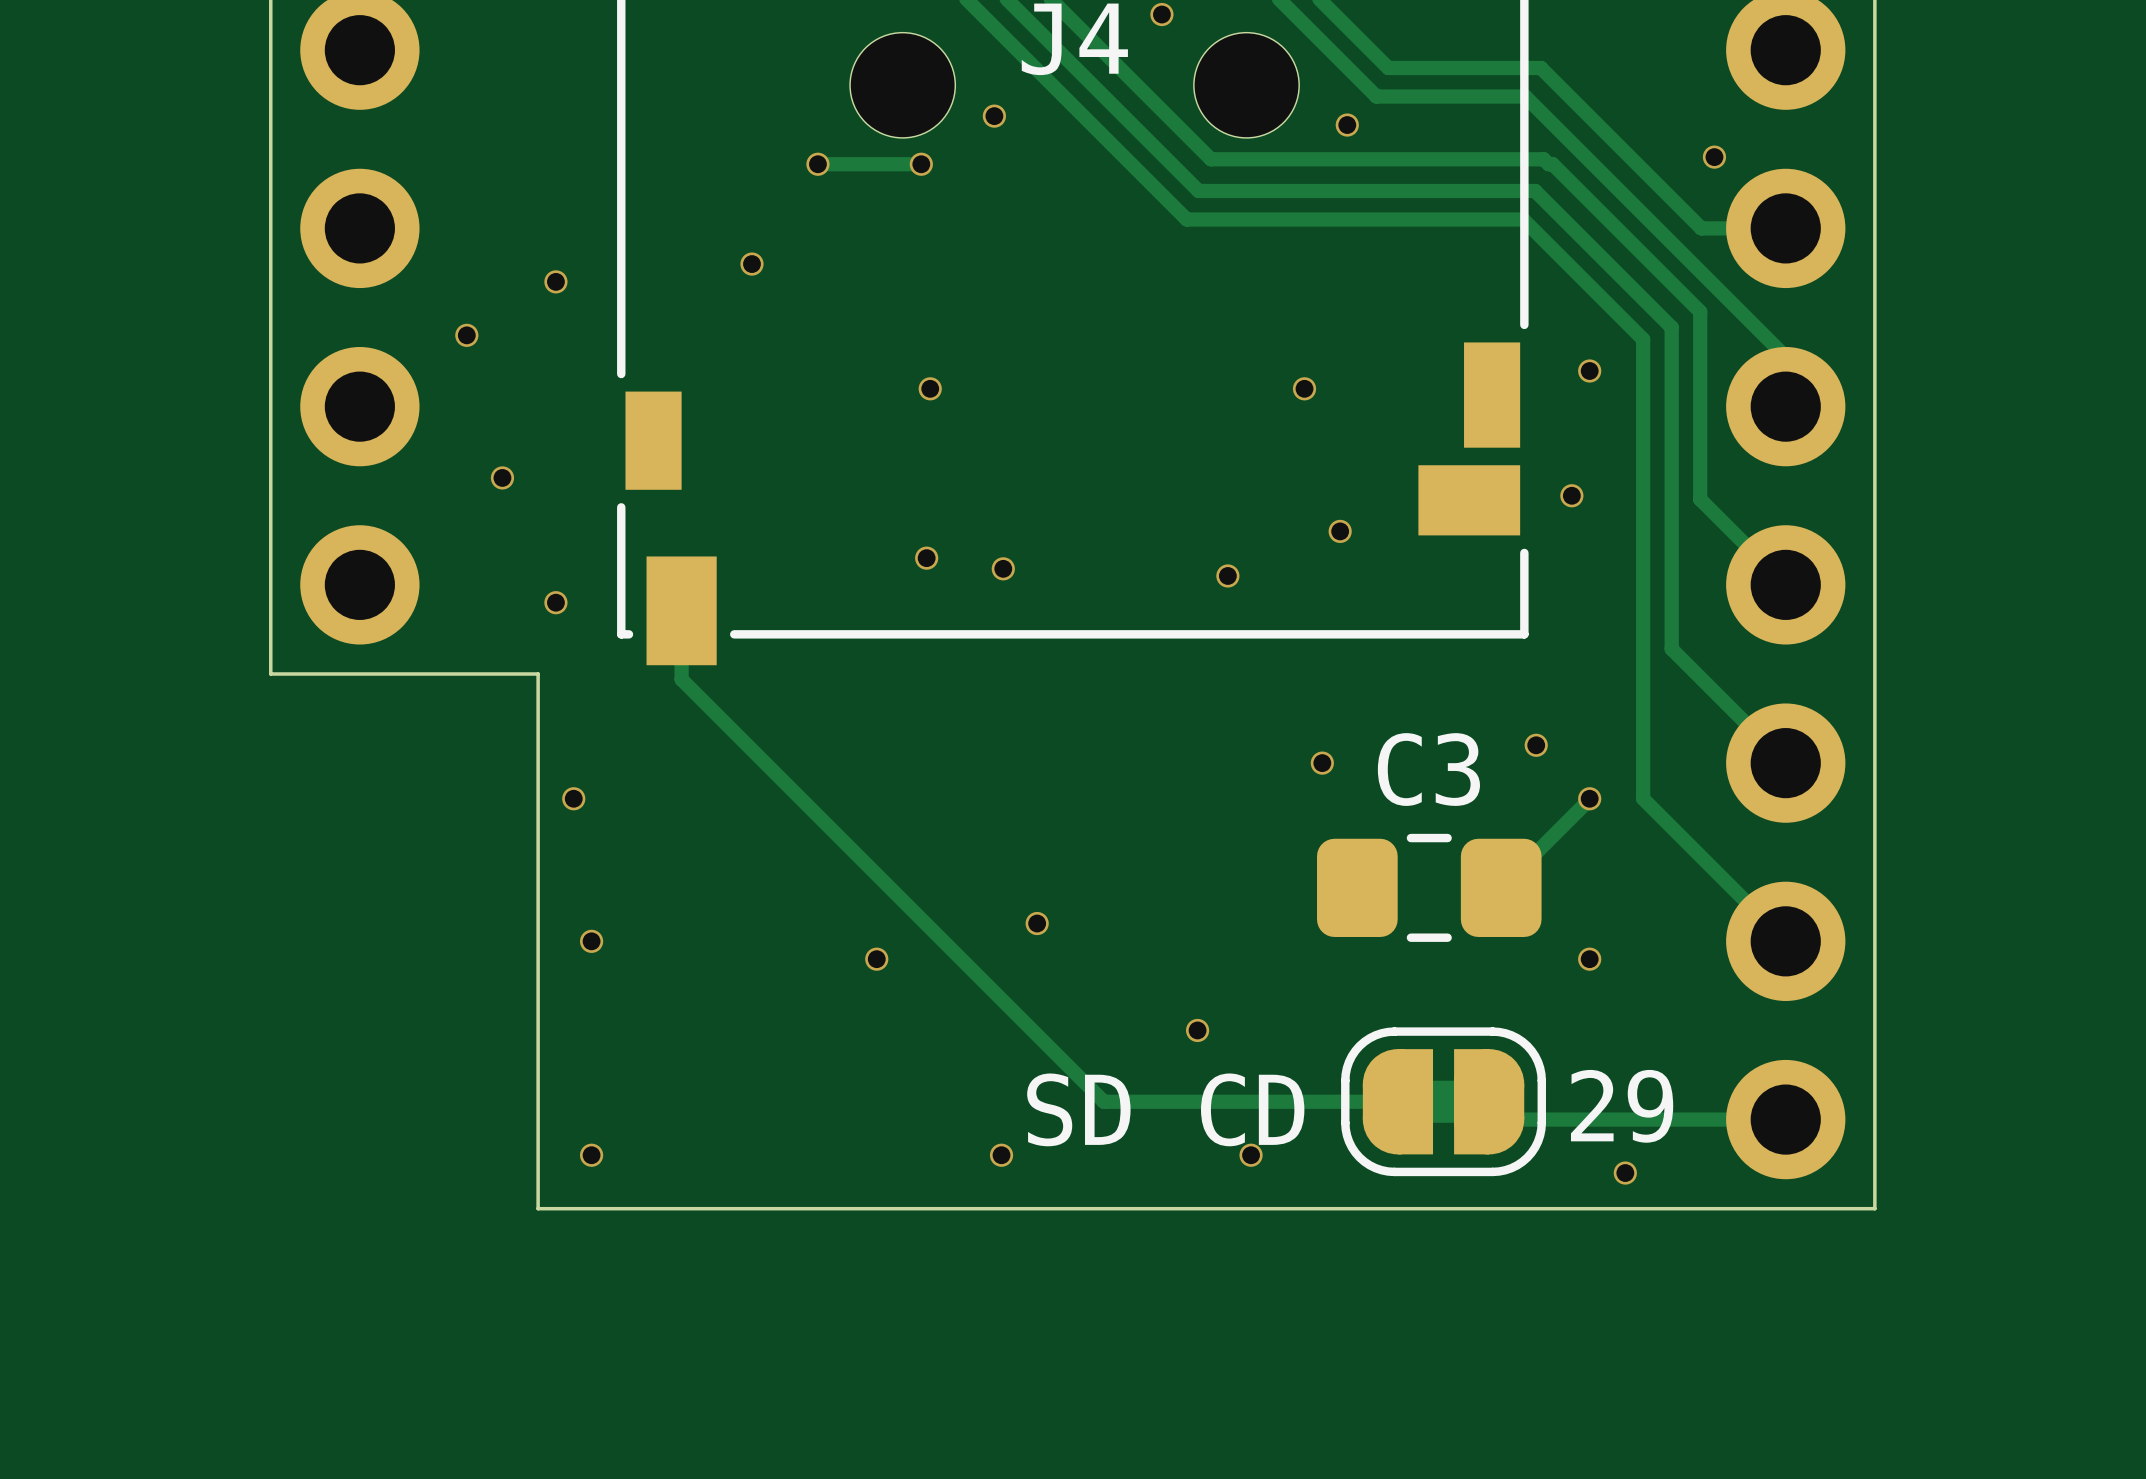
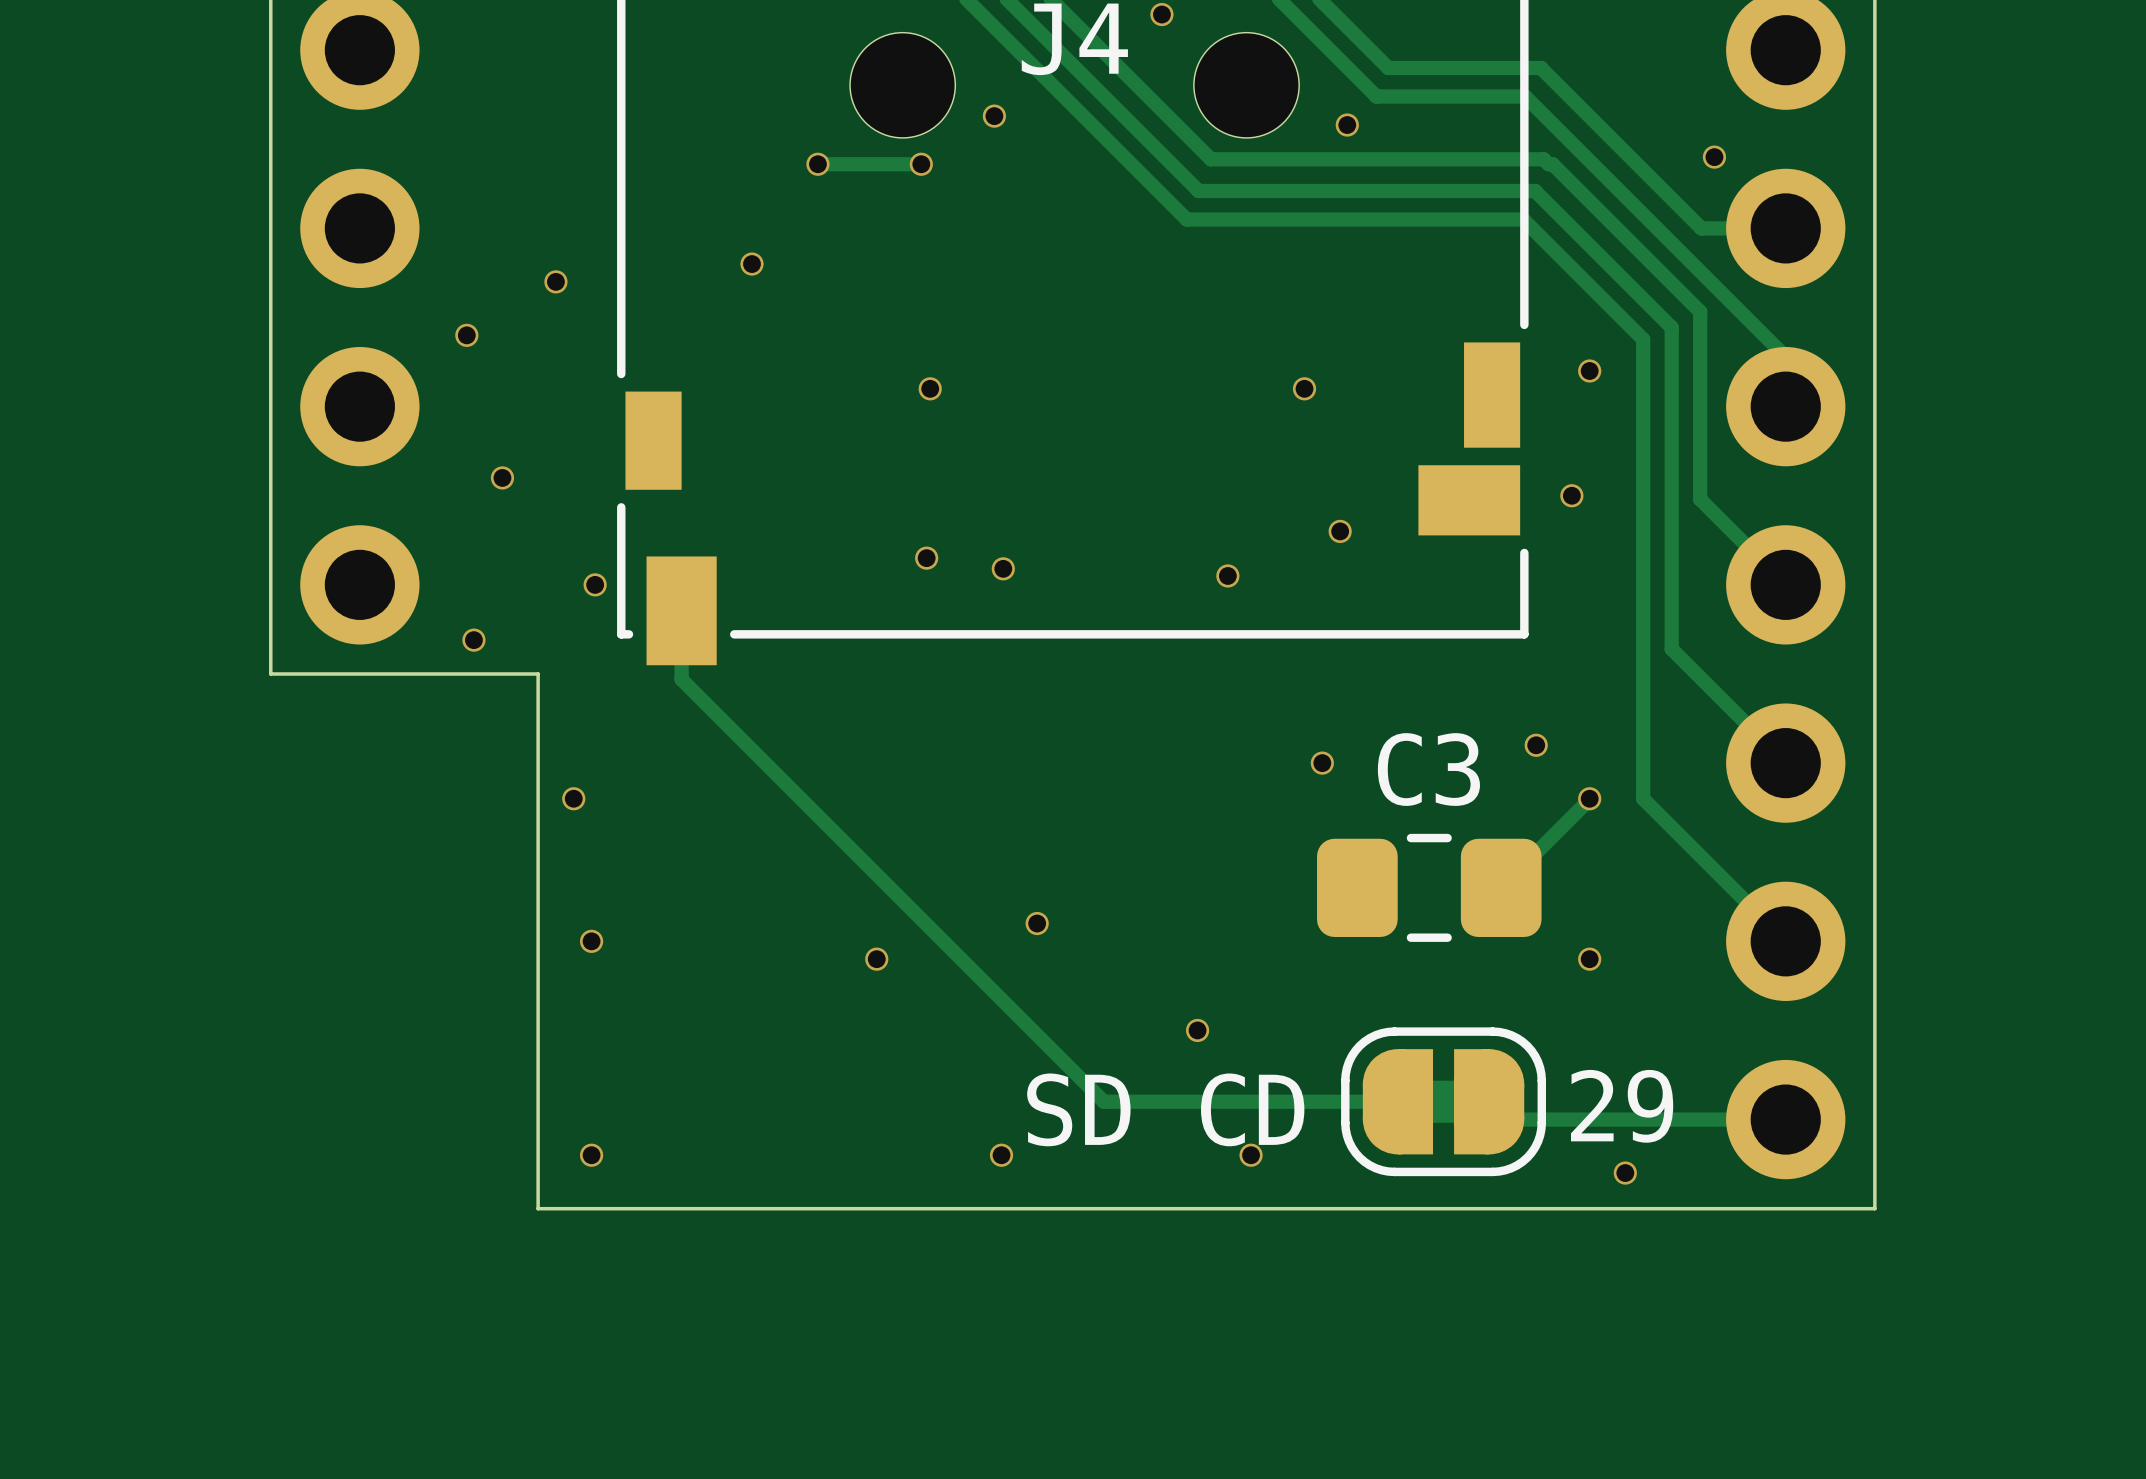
via position: (555, 602) -> (595, 584)
via: none -> (473, 640)

